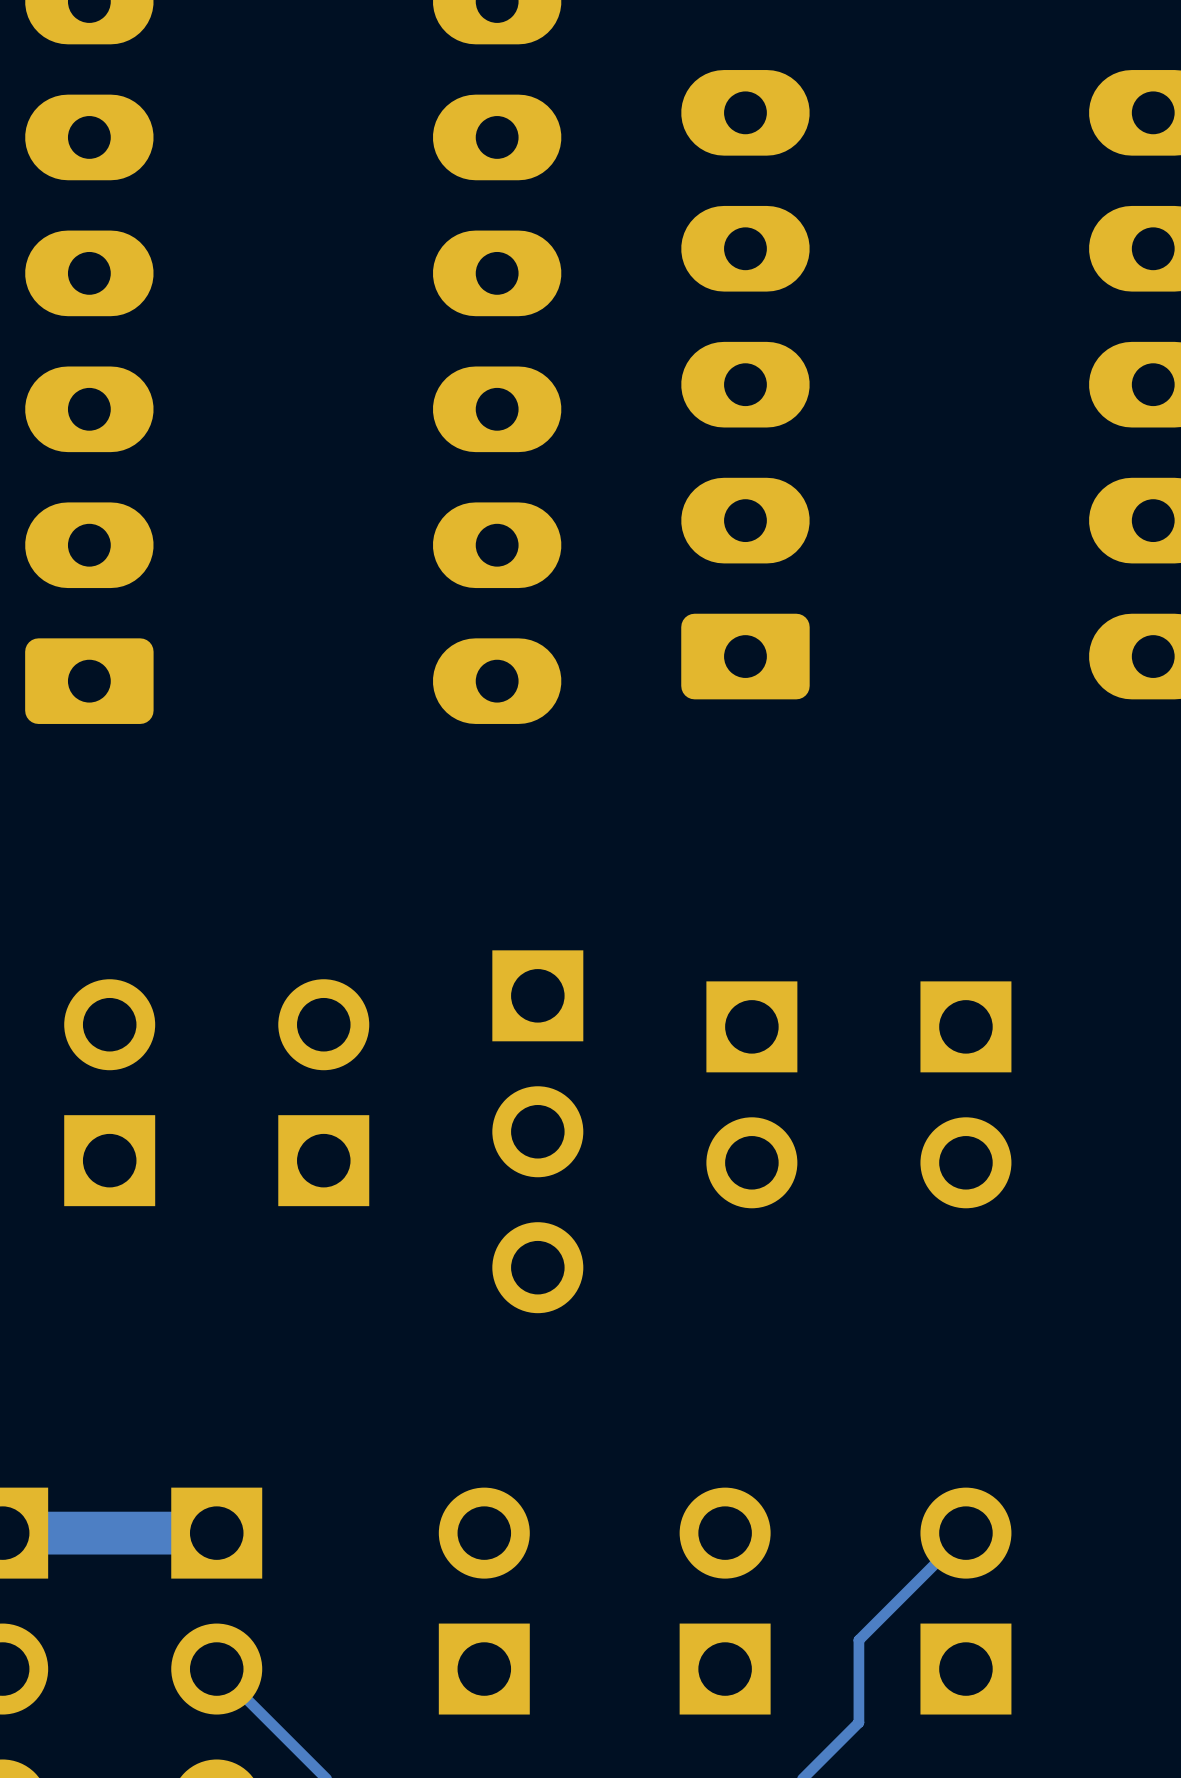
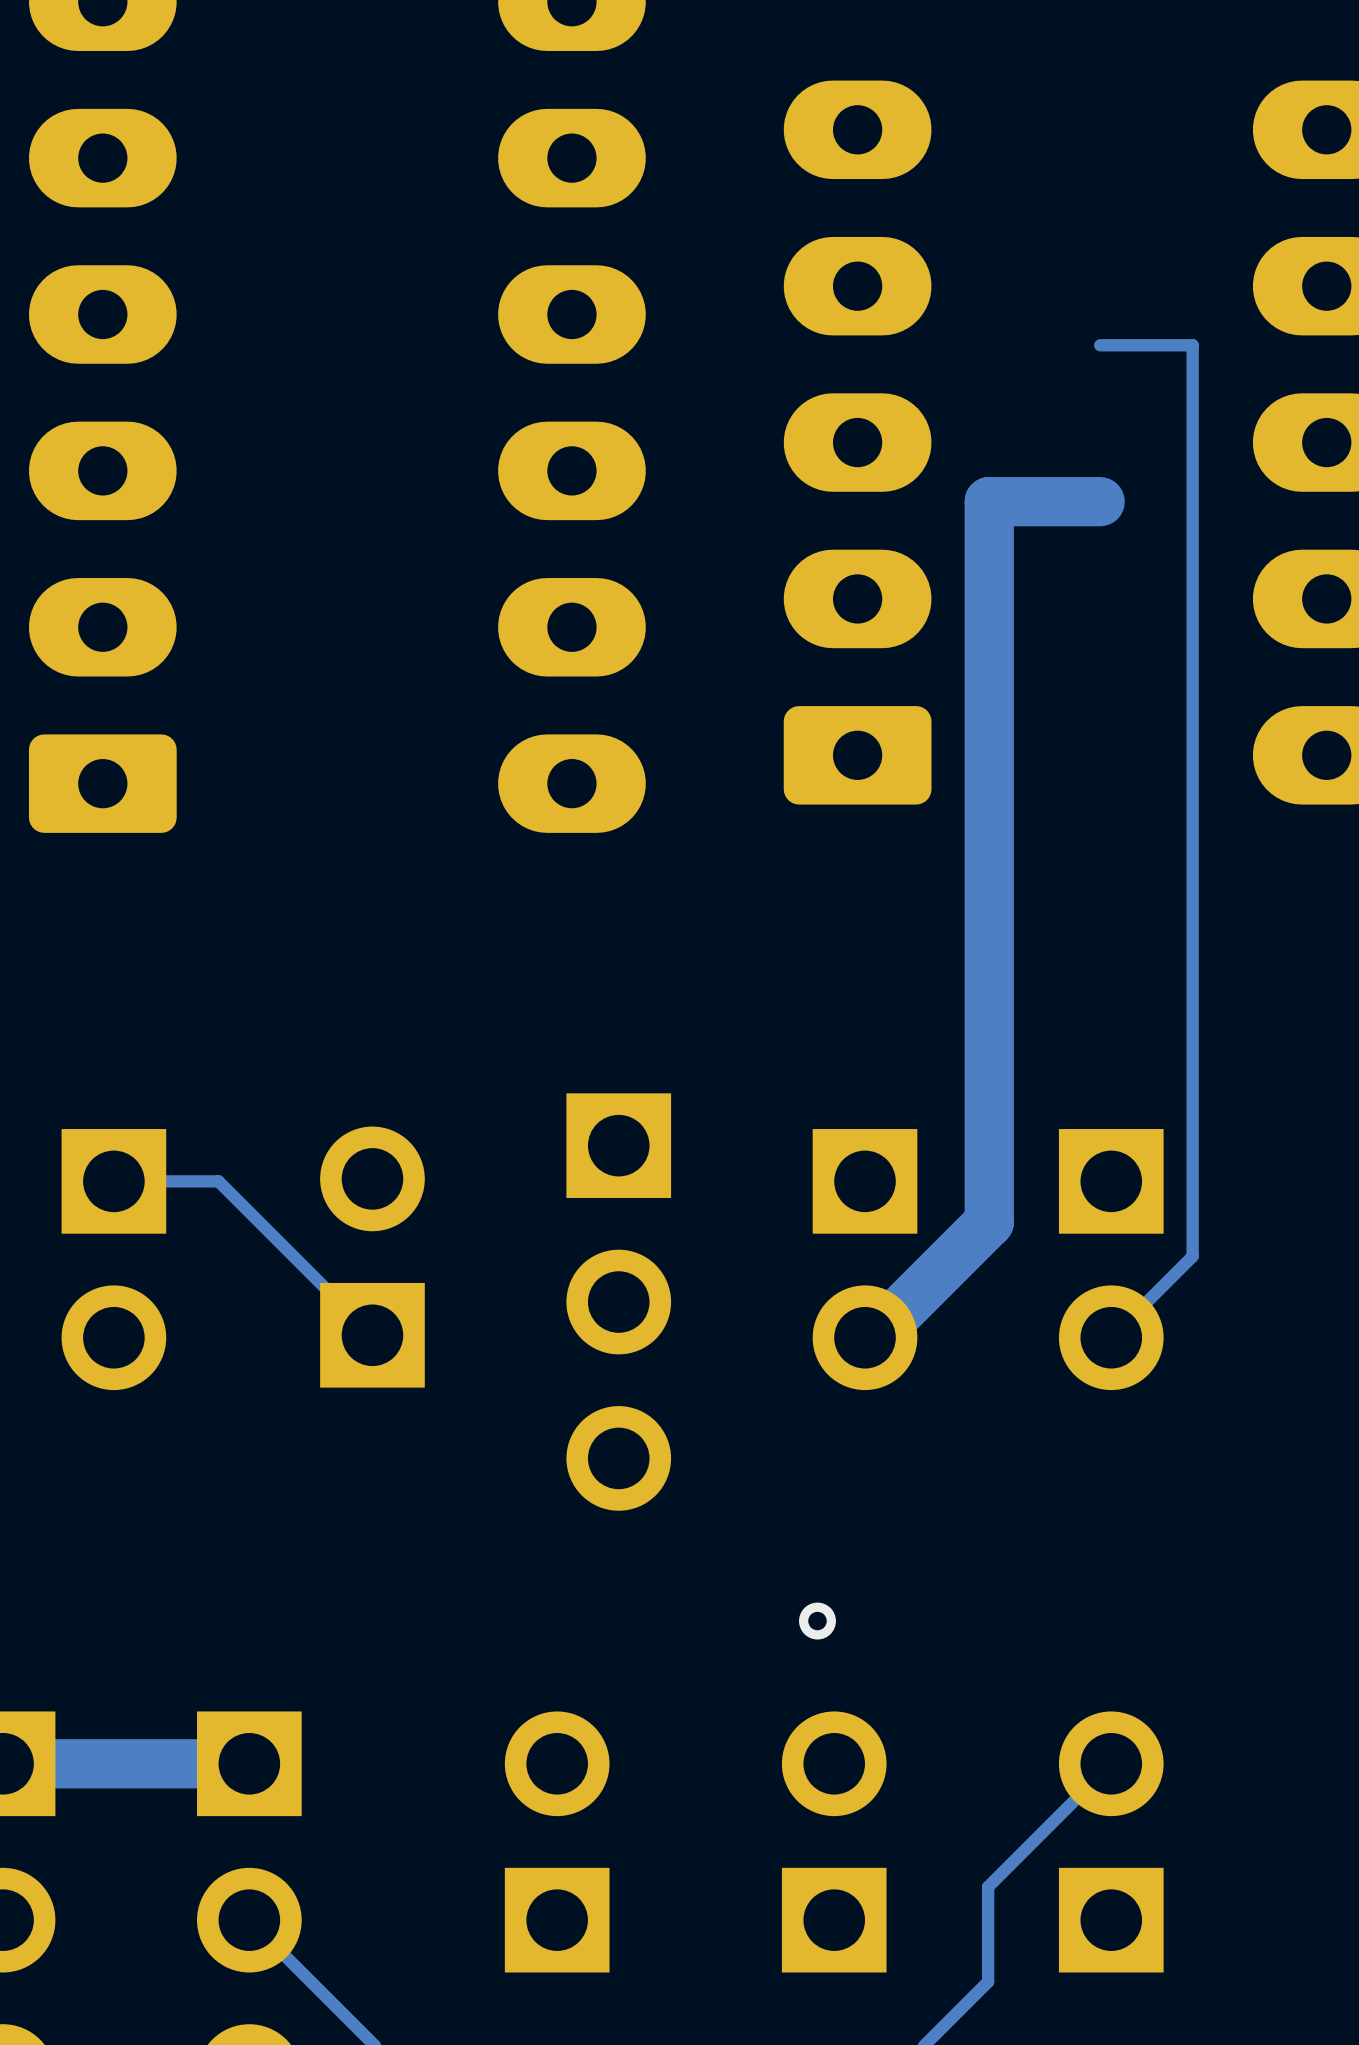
track: none -> (1100, 345) (1192, 345) (1192, 1256) (1111, 1337)
track: none -> (1100, 501) (989, 501) (989, 1222) (873, 1337) (865, 1337)
track: none -> (113, 1181) (218, 1181) (372, 1335)
part rotation: 0° (109, 1092) -> 180° (113, 1259)
via: none -> (817, 1621)

